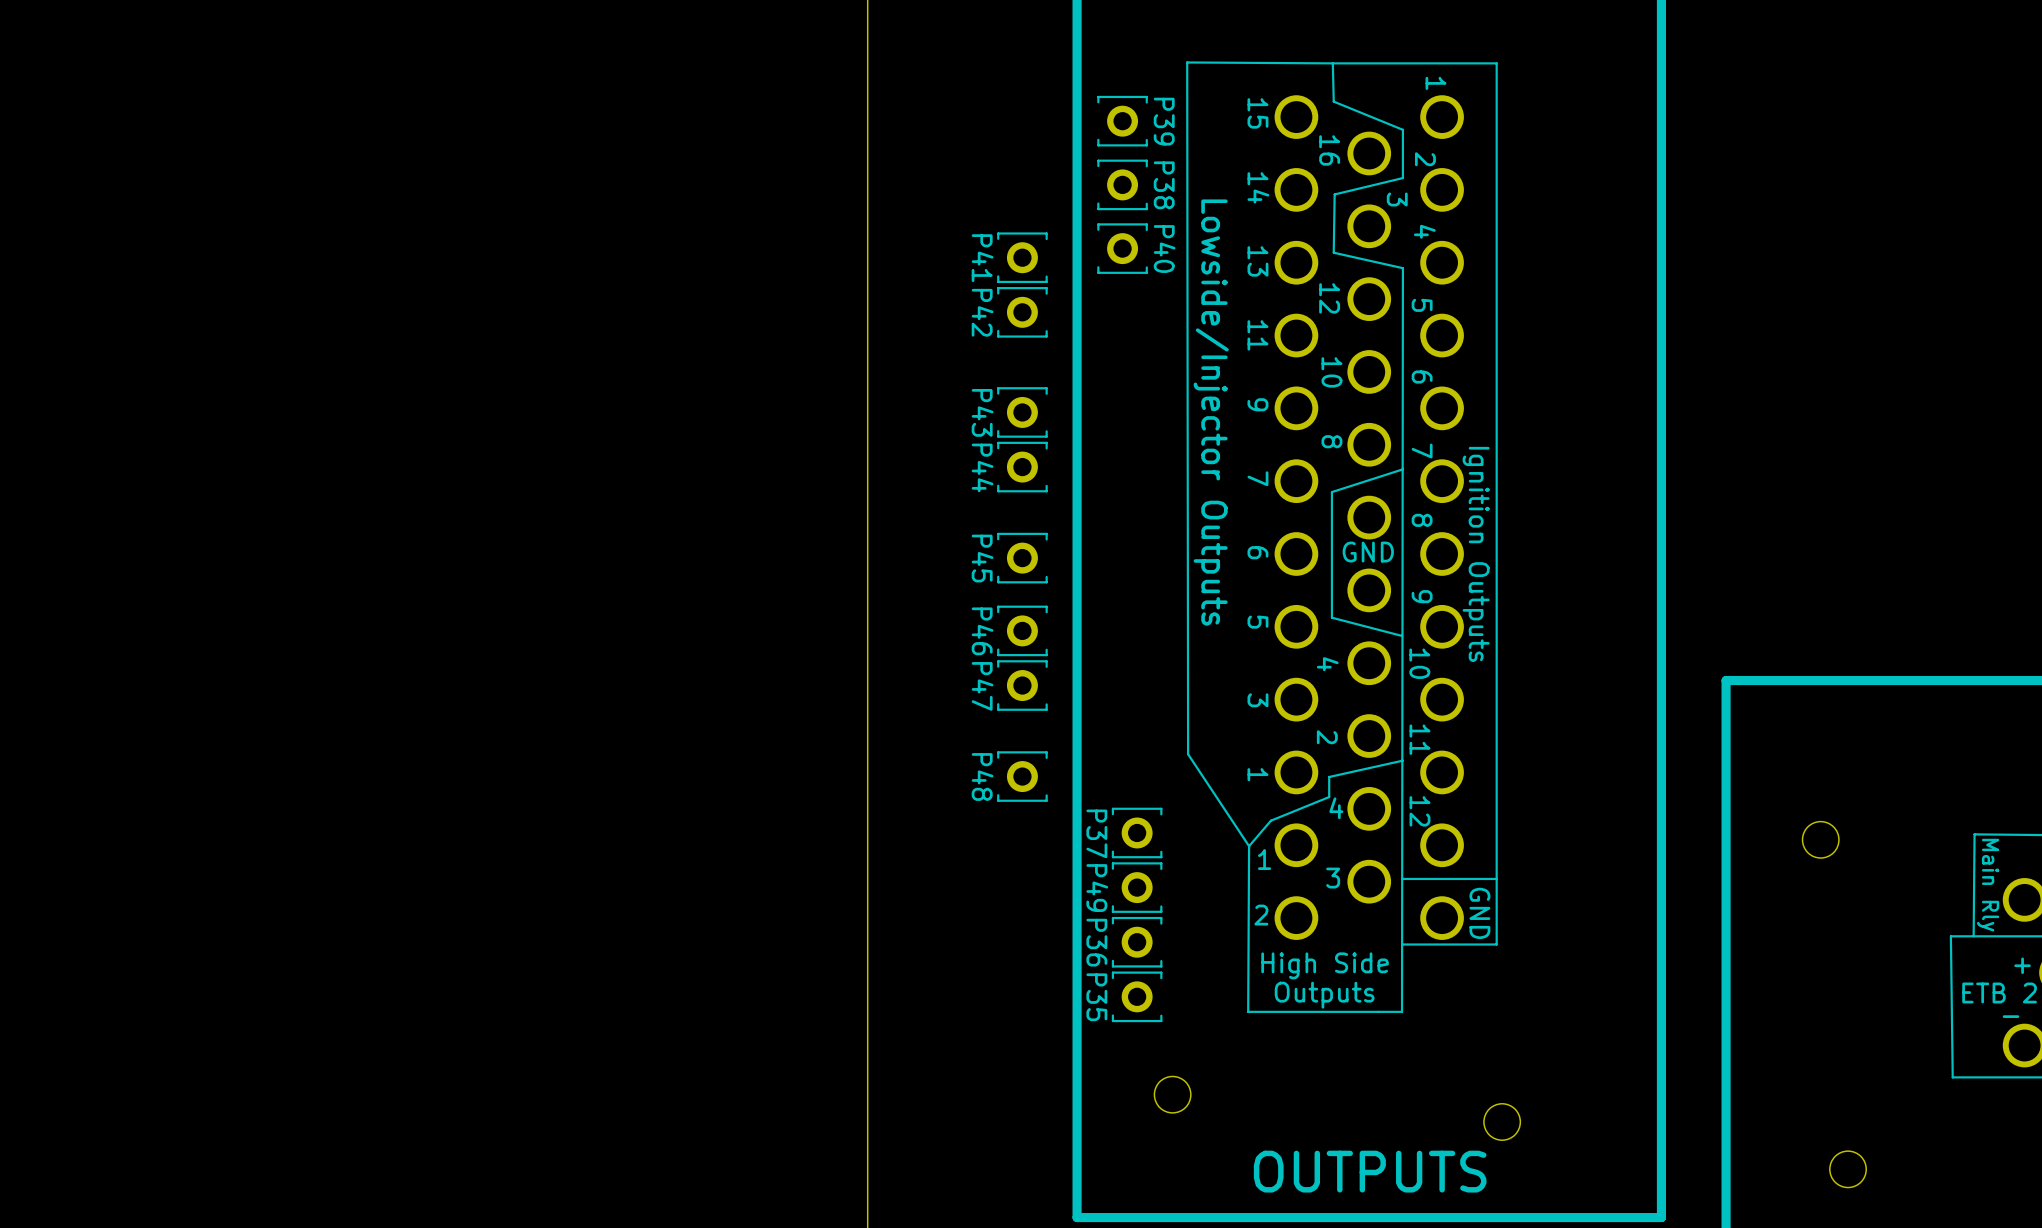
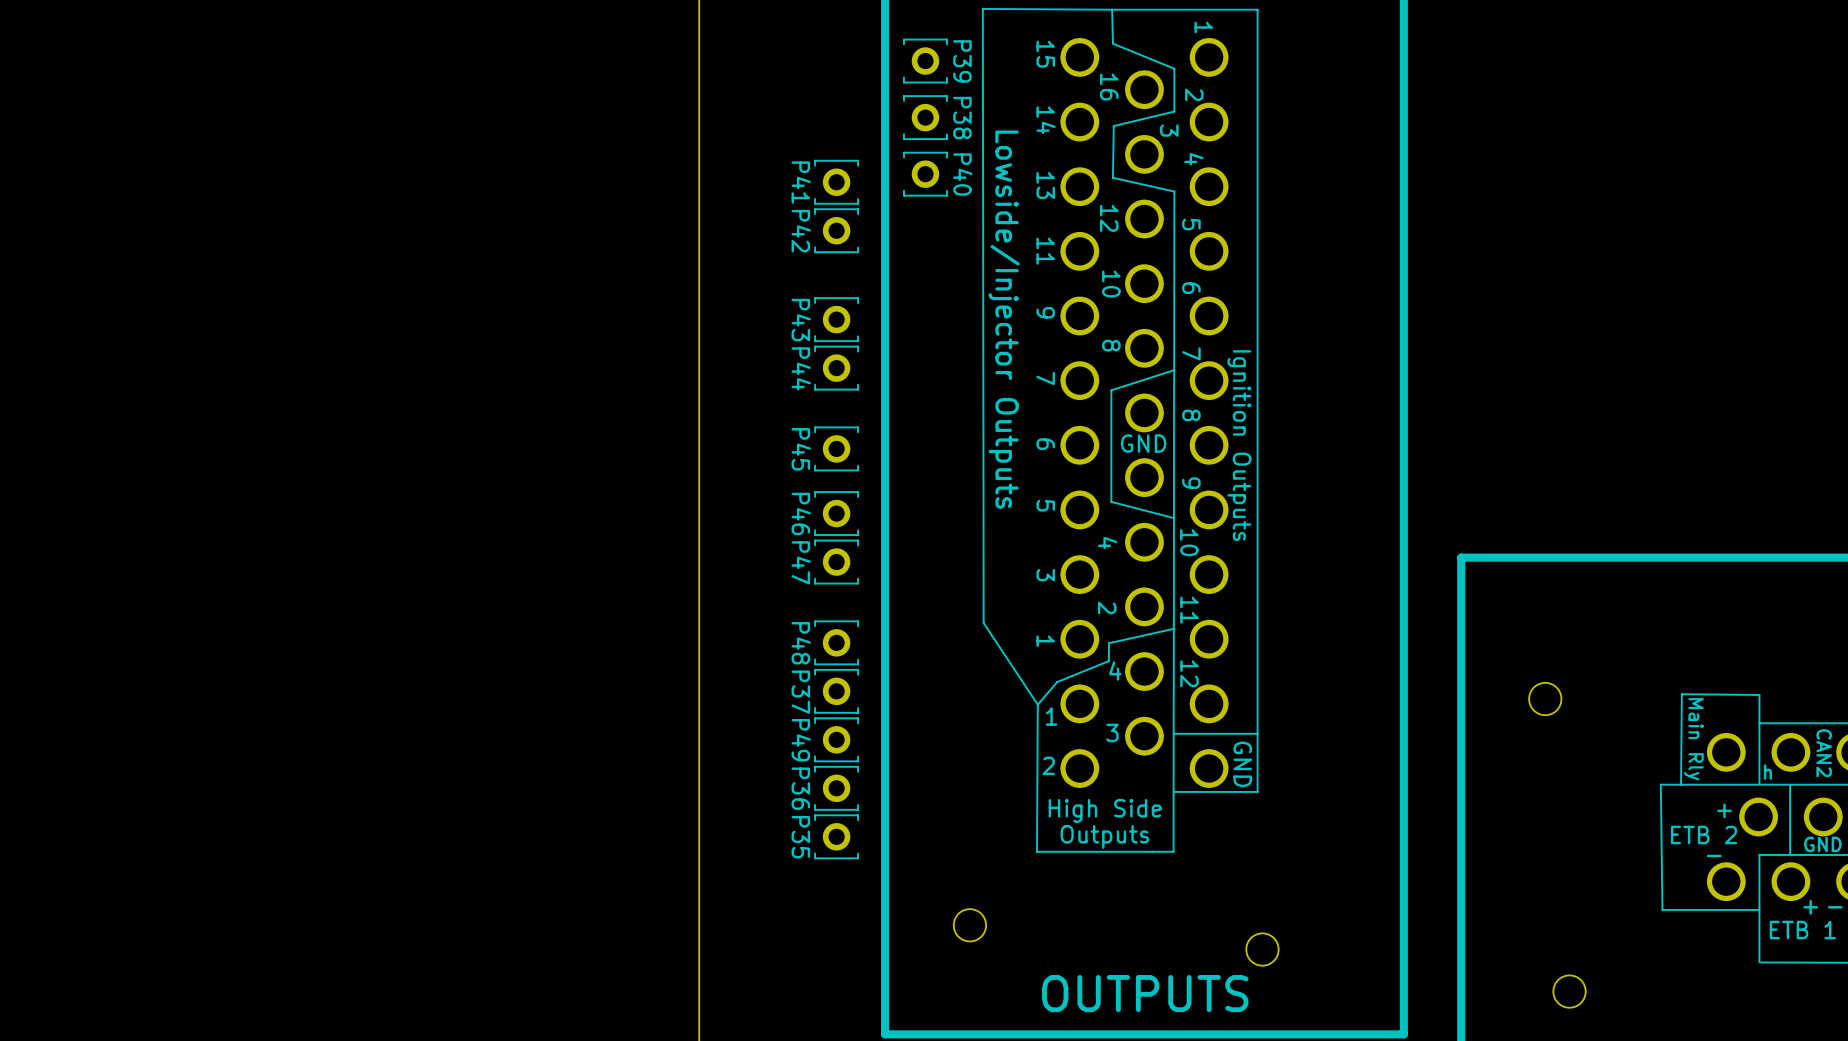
P37 position: (1137, 832) -> (836, 691)
P49 position: (1137, 887) -> (836, 739)
P36 position: (1137, 942) -> (836, 788)
P35 position: (1137, 996) -> (836, 836)

